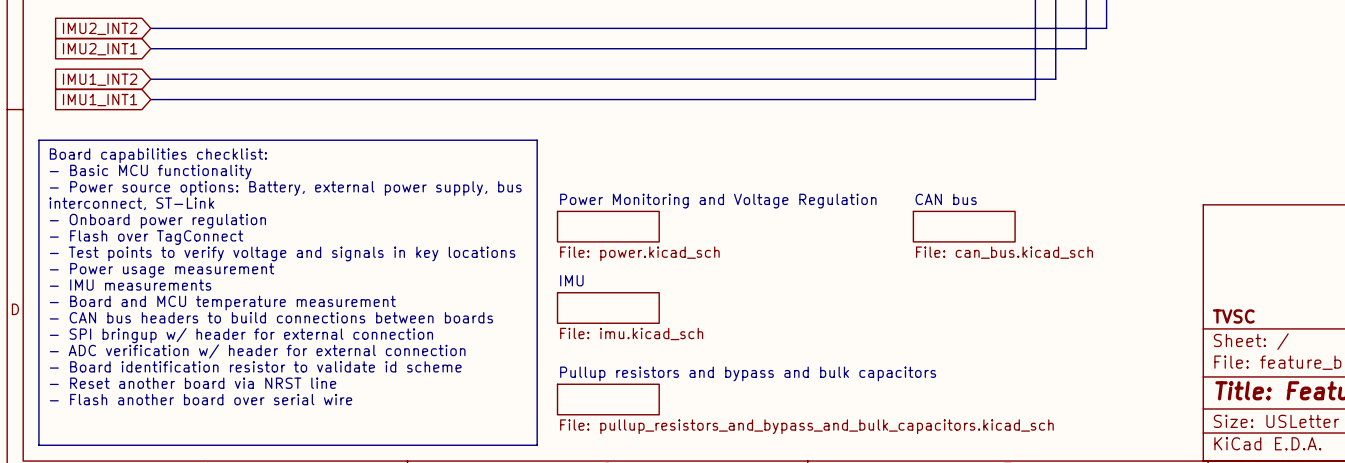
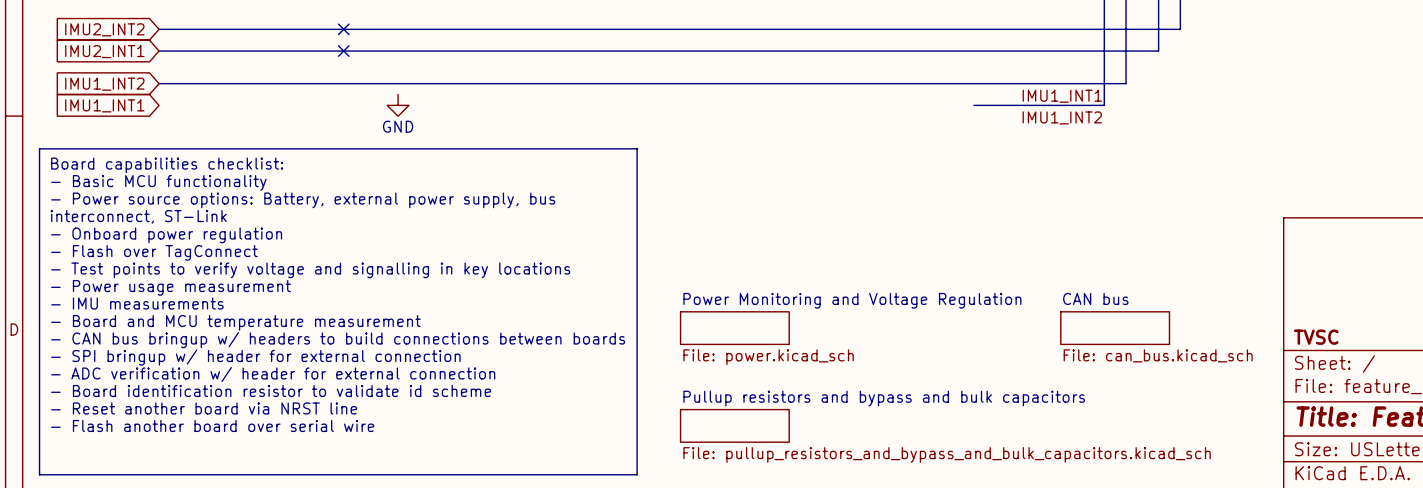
no-connect mark: none -> (343, 29)
no-connect mark: none -> (343, 51)
label: none -> IMU1_INT1 (1062, 96)
wire: (150, 99) (913, 99) -> none
power symbol: none -> GND (398, 105)
label: none -> IMU1_INT2 (1062, 117)
line: (537, 140) (537, 445) -> (571, 148) (637, 148) (637, 474) (571, 474)
sheet Power Monitoring and Voltage Regulation position: (608, 226) -> (734, 328)
sheet CAN bus position: (964, 226) -> (1115, 328)
text: - Test points to verify voltage and signals in key locations (282, 253) -> - Test points to verify voltage and signalling in key locations (310, 270)
sheet IMU: File: imu.kicad_sch (608, 308) -> none
text: - CAN bus headers to build connections between boards (271, 317) -> - CAN bus bringup w/ headers to build connections between boards (338, 340)
sheet Pullup resistors and bypass and bulk capacitors position: (608, 399) -> (734, 425)

